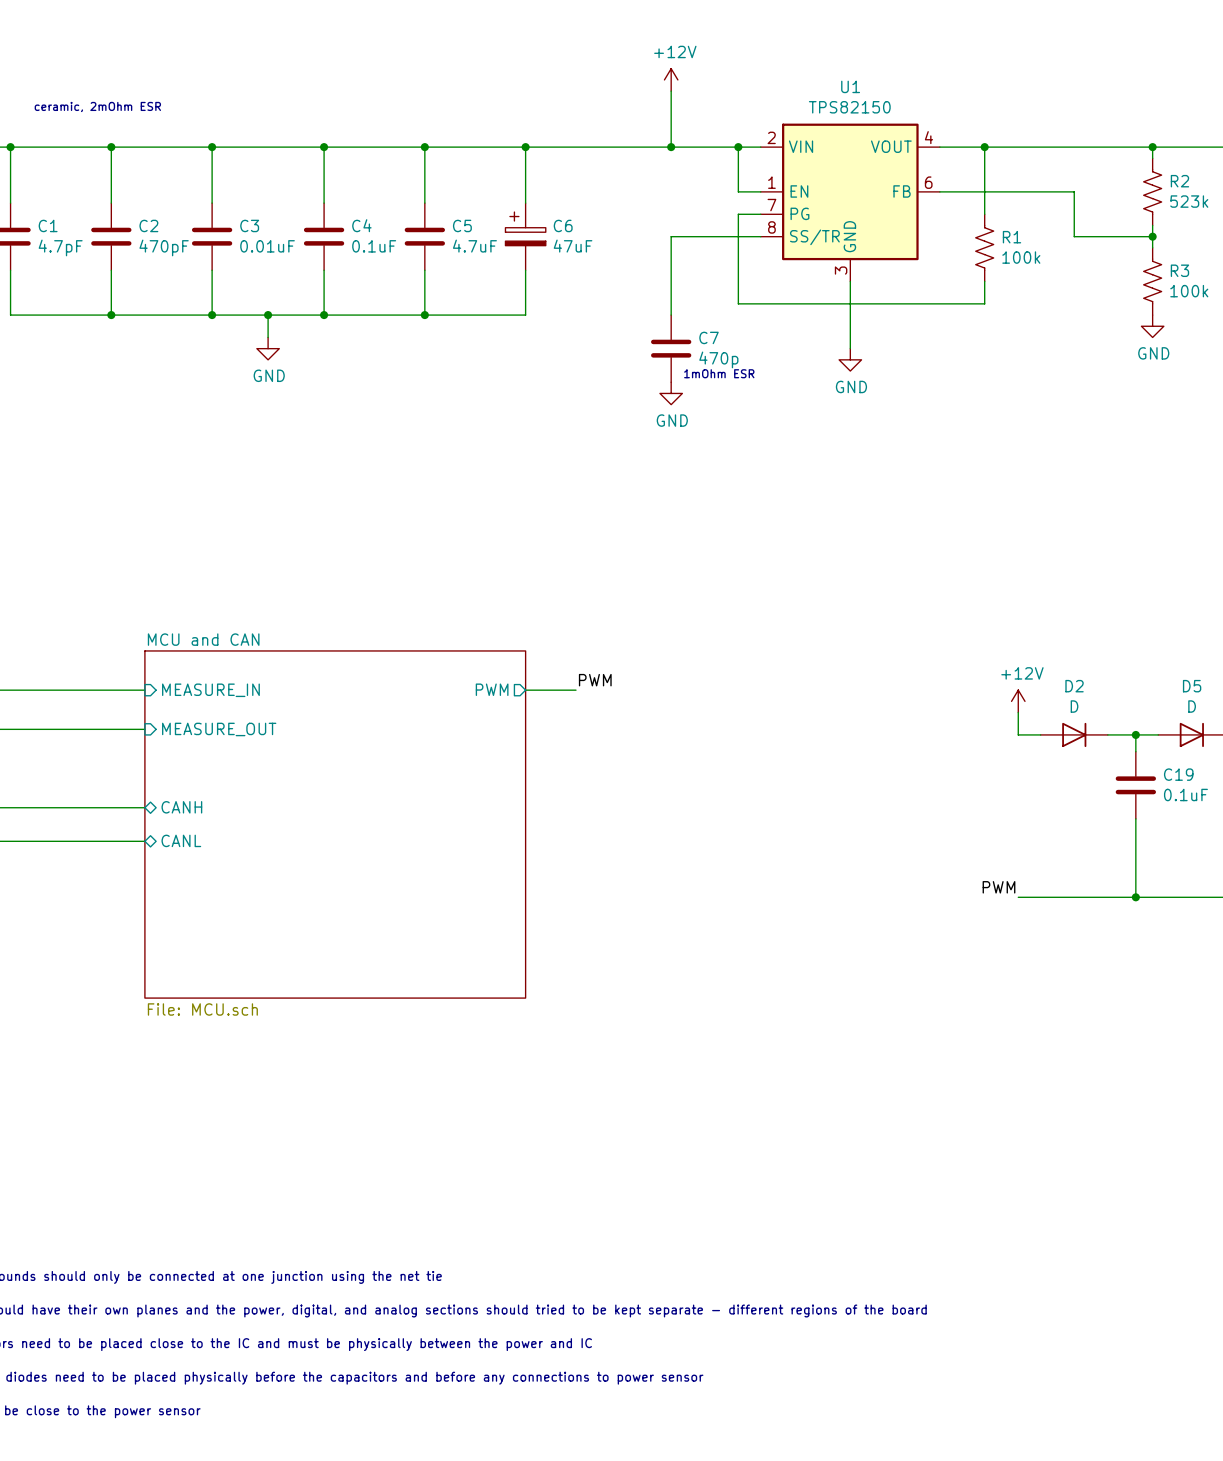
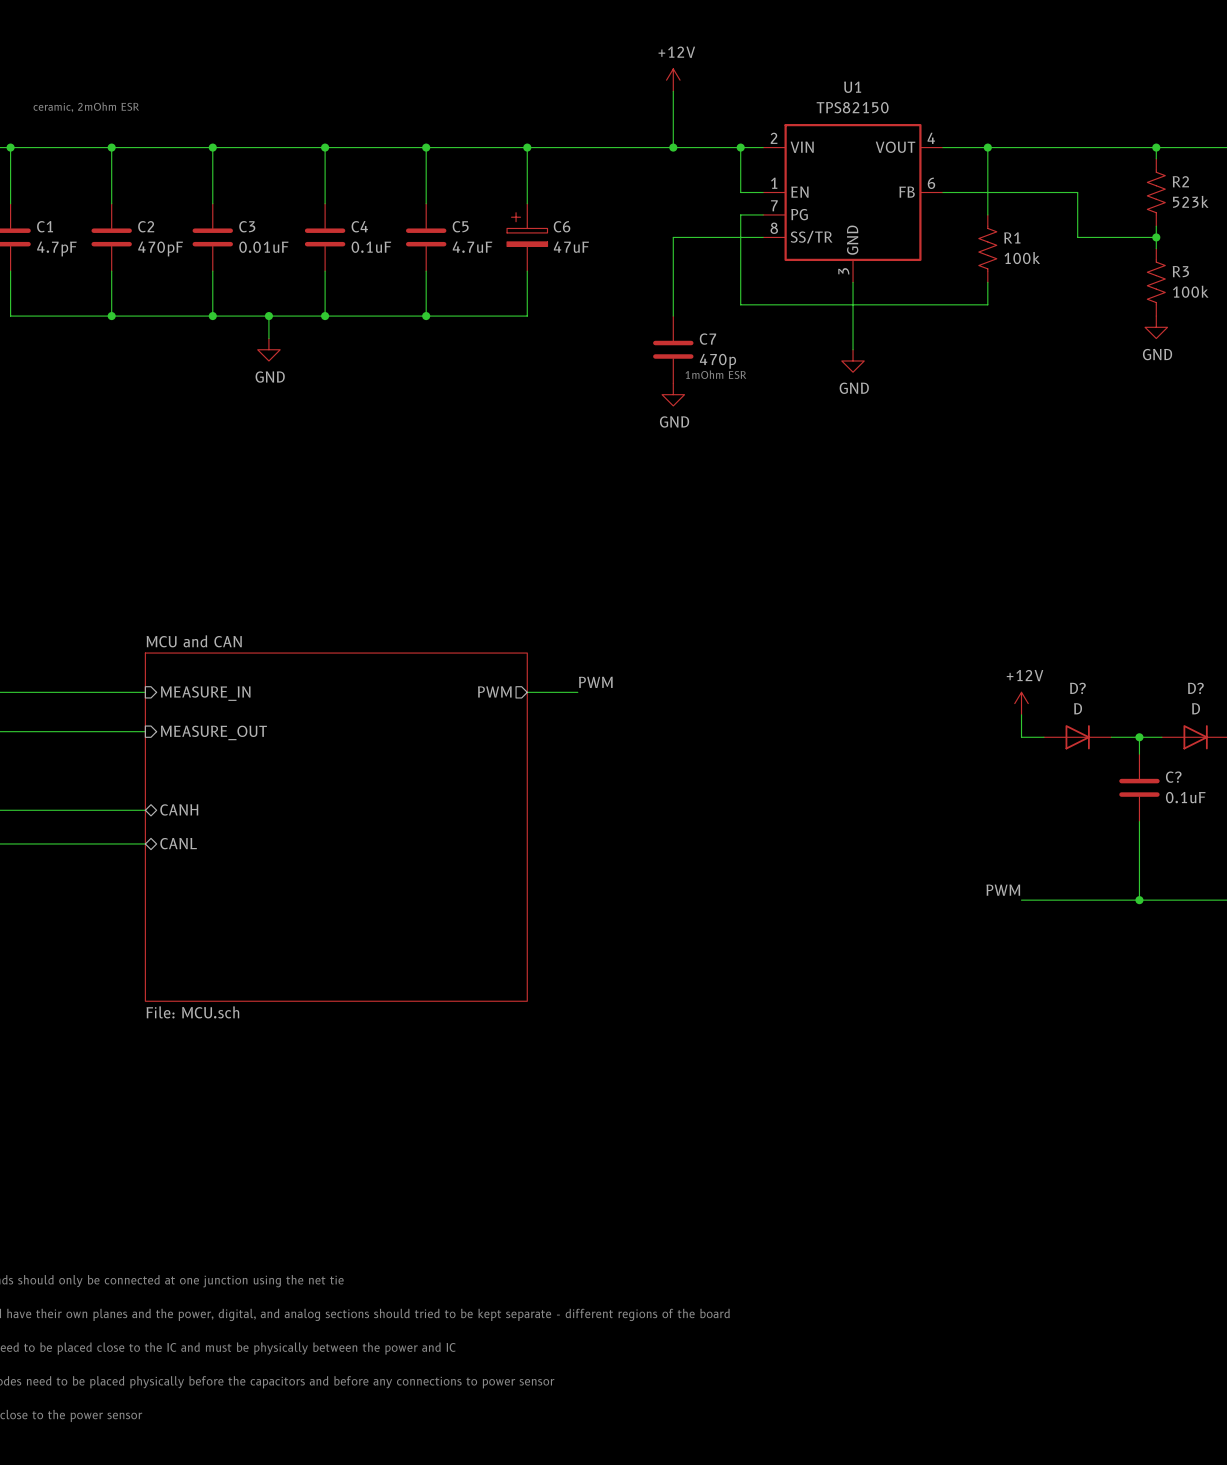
D2 name: D2 (1074, 686) -> D? (1077, 688)
D5 name: D5 (1192, 686) -> D? (1195, 688)
C19 name: C19 (1178, 774) -> C? (1173, 777)

